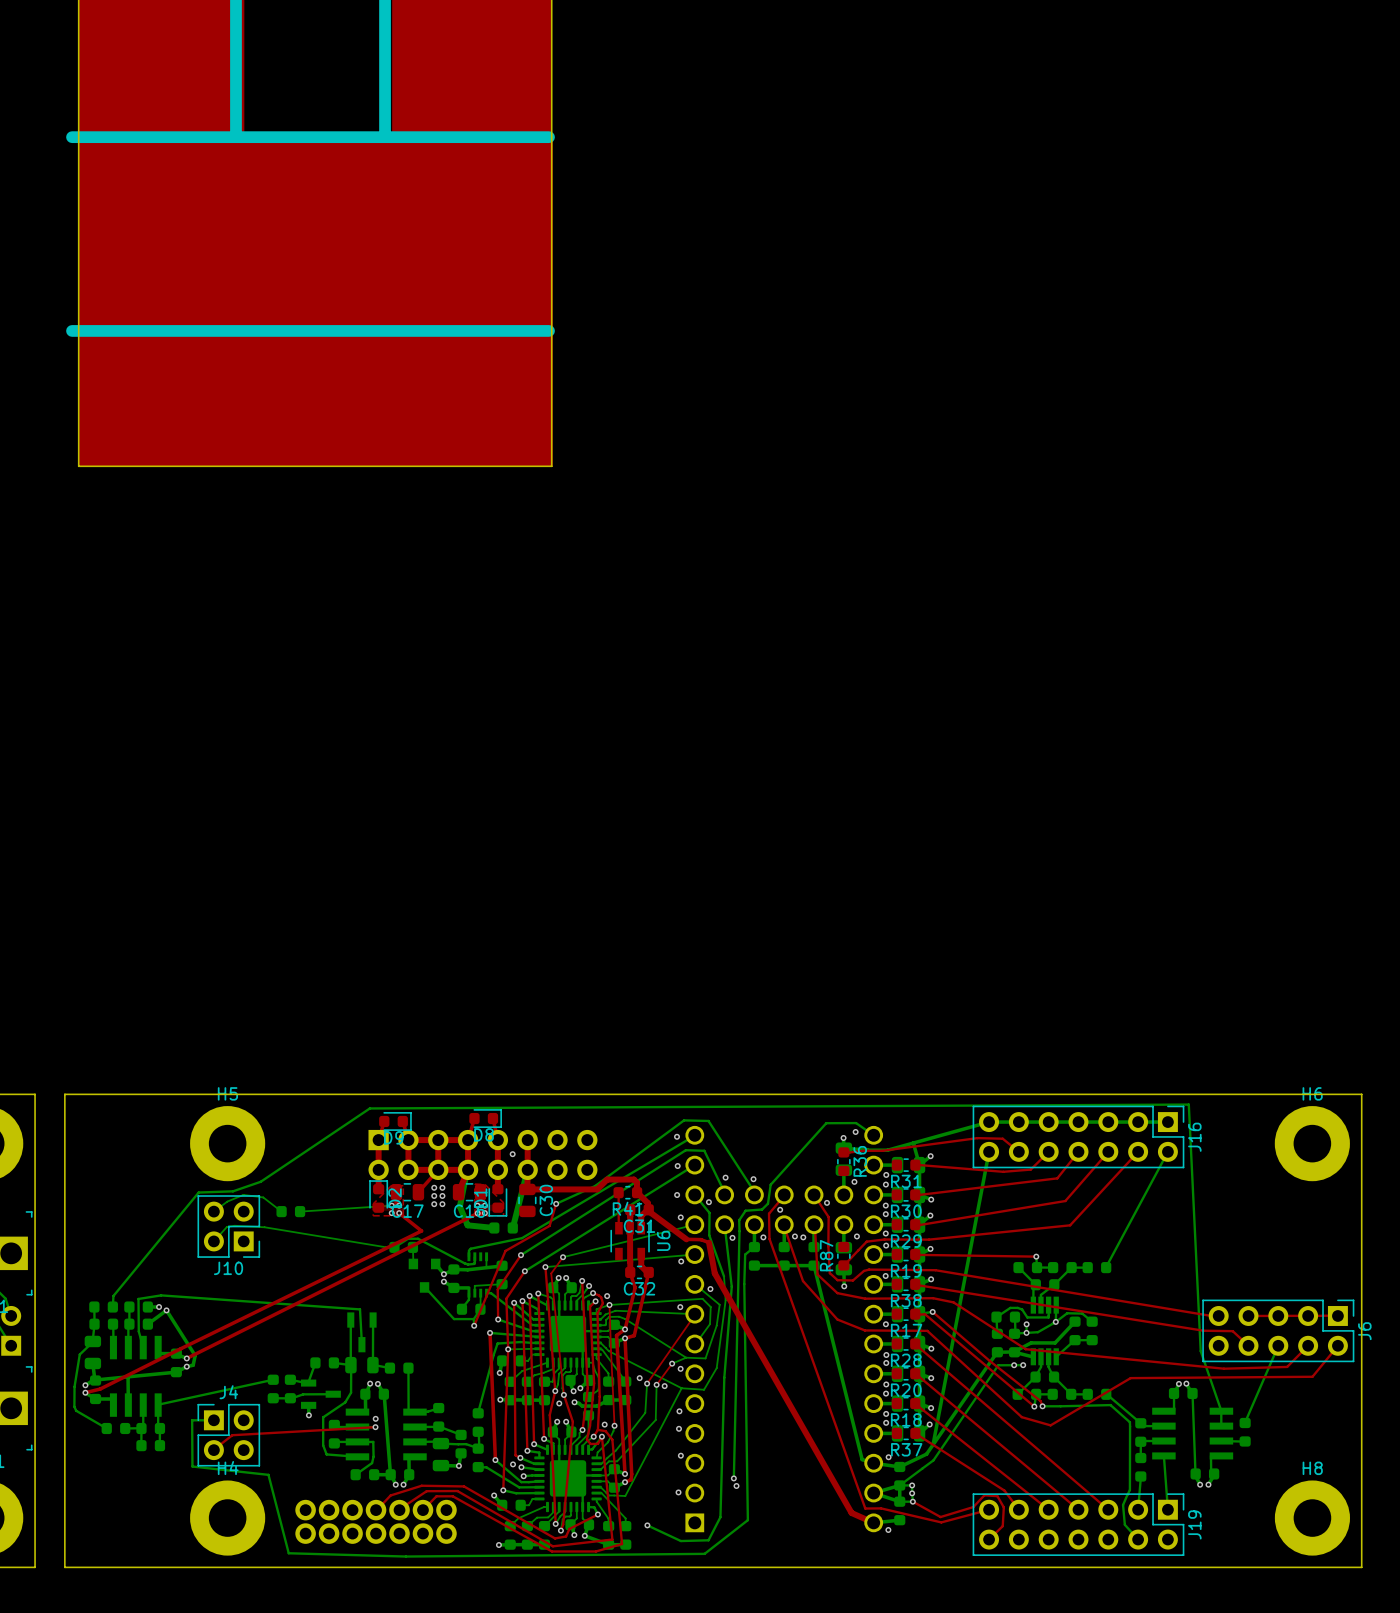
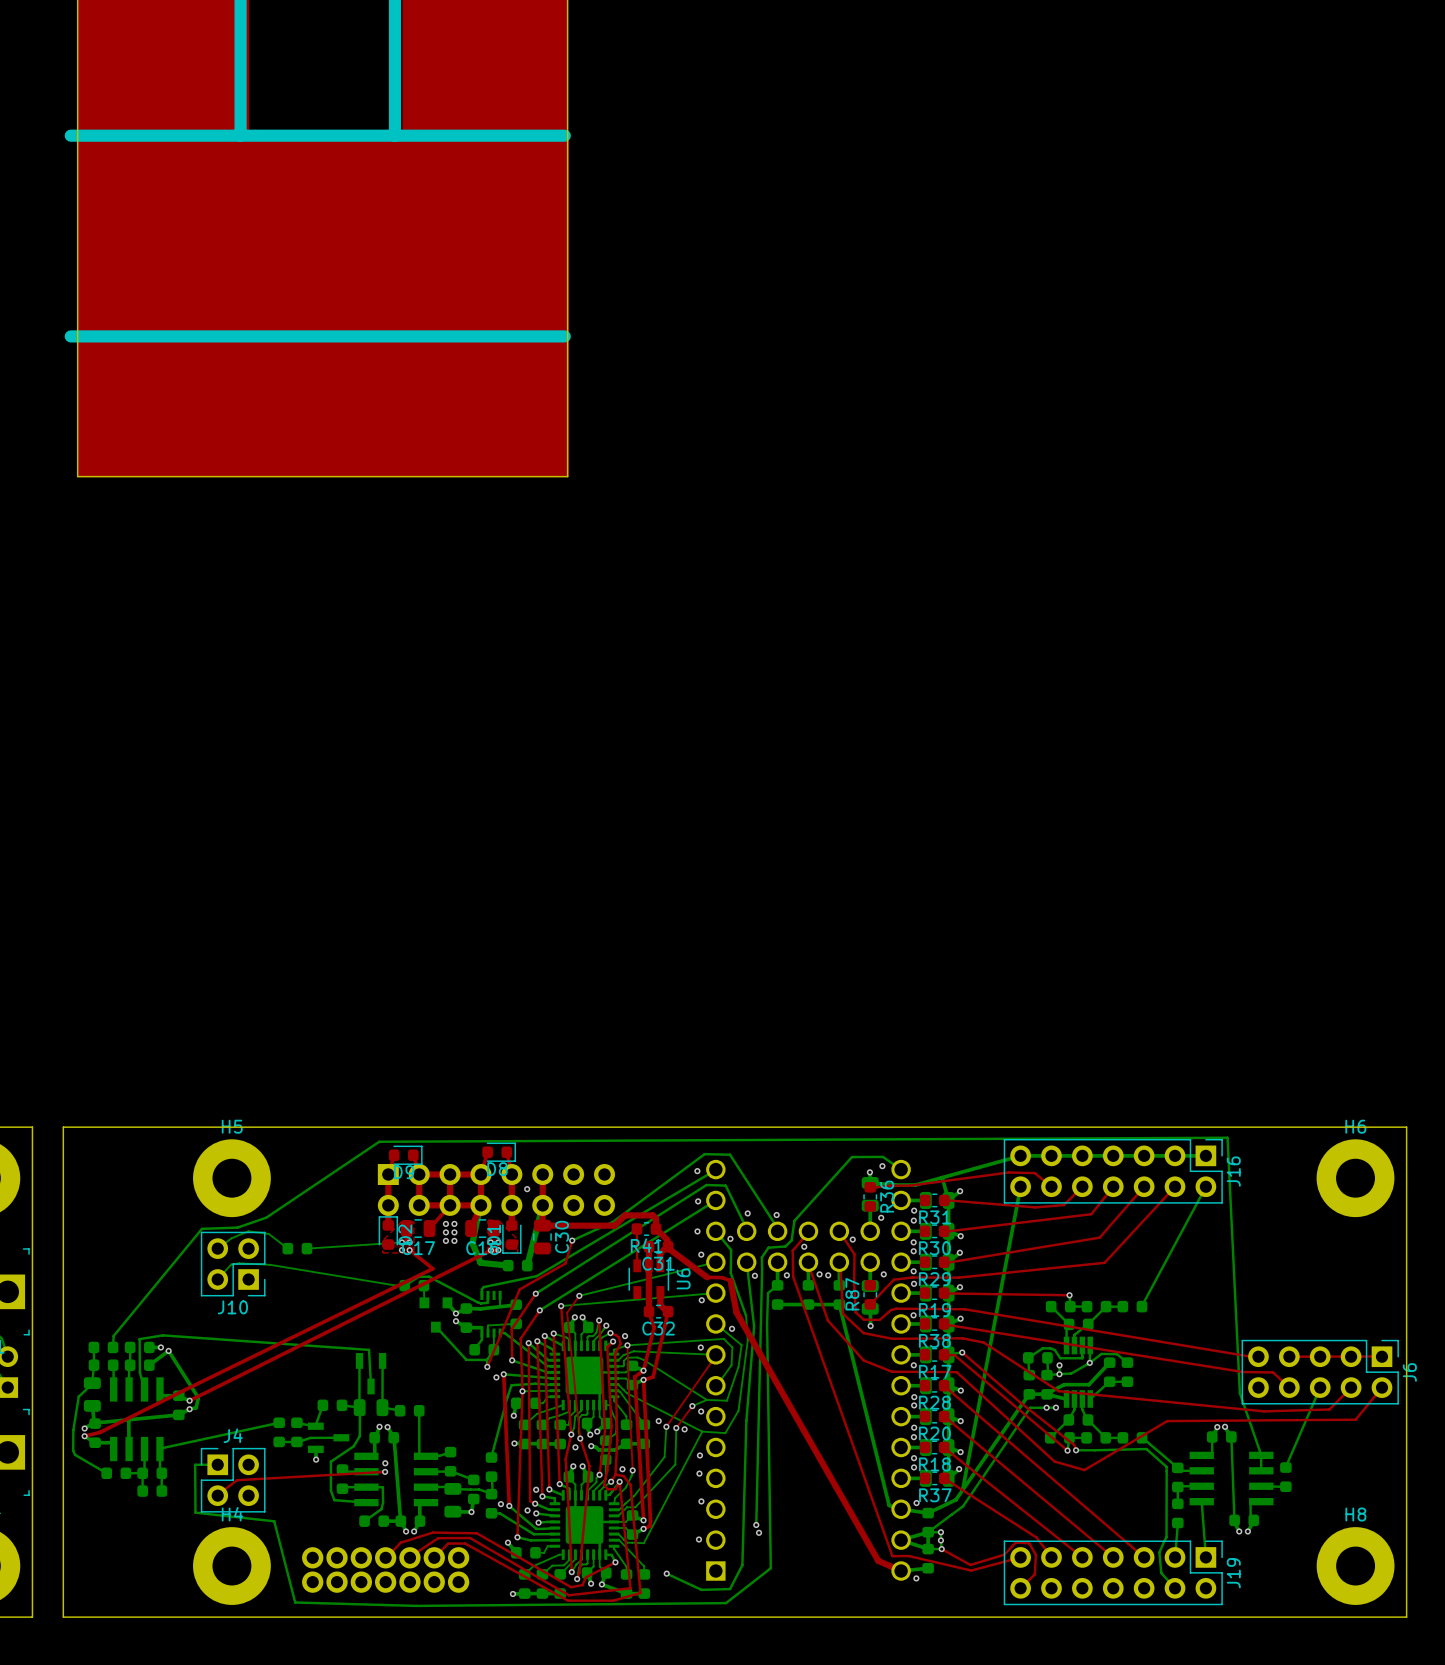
via: none -> (496, 1377)
via: none -> (536, 1489)
via: none -> (500, 1504)

